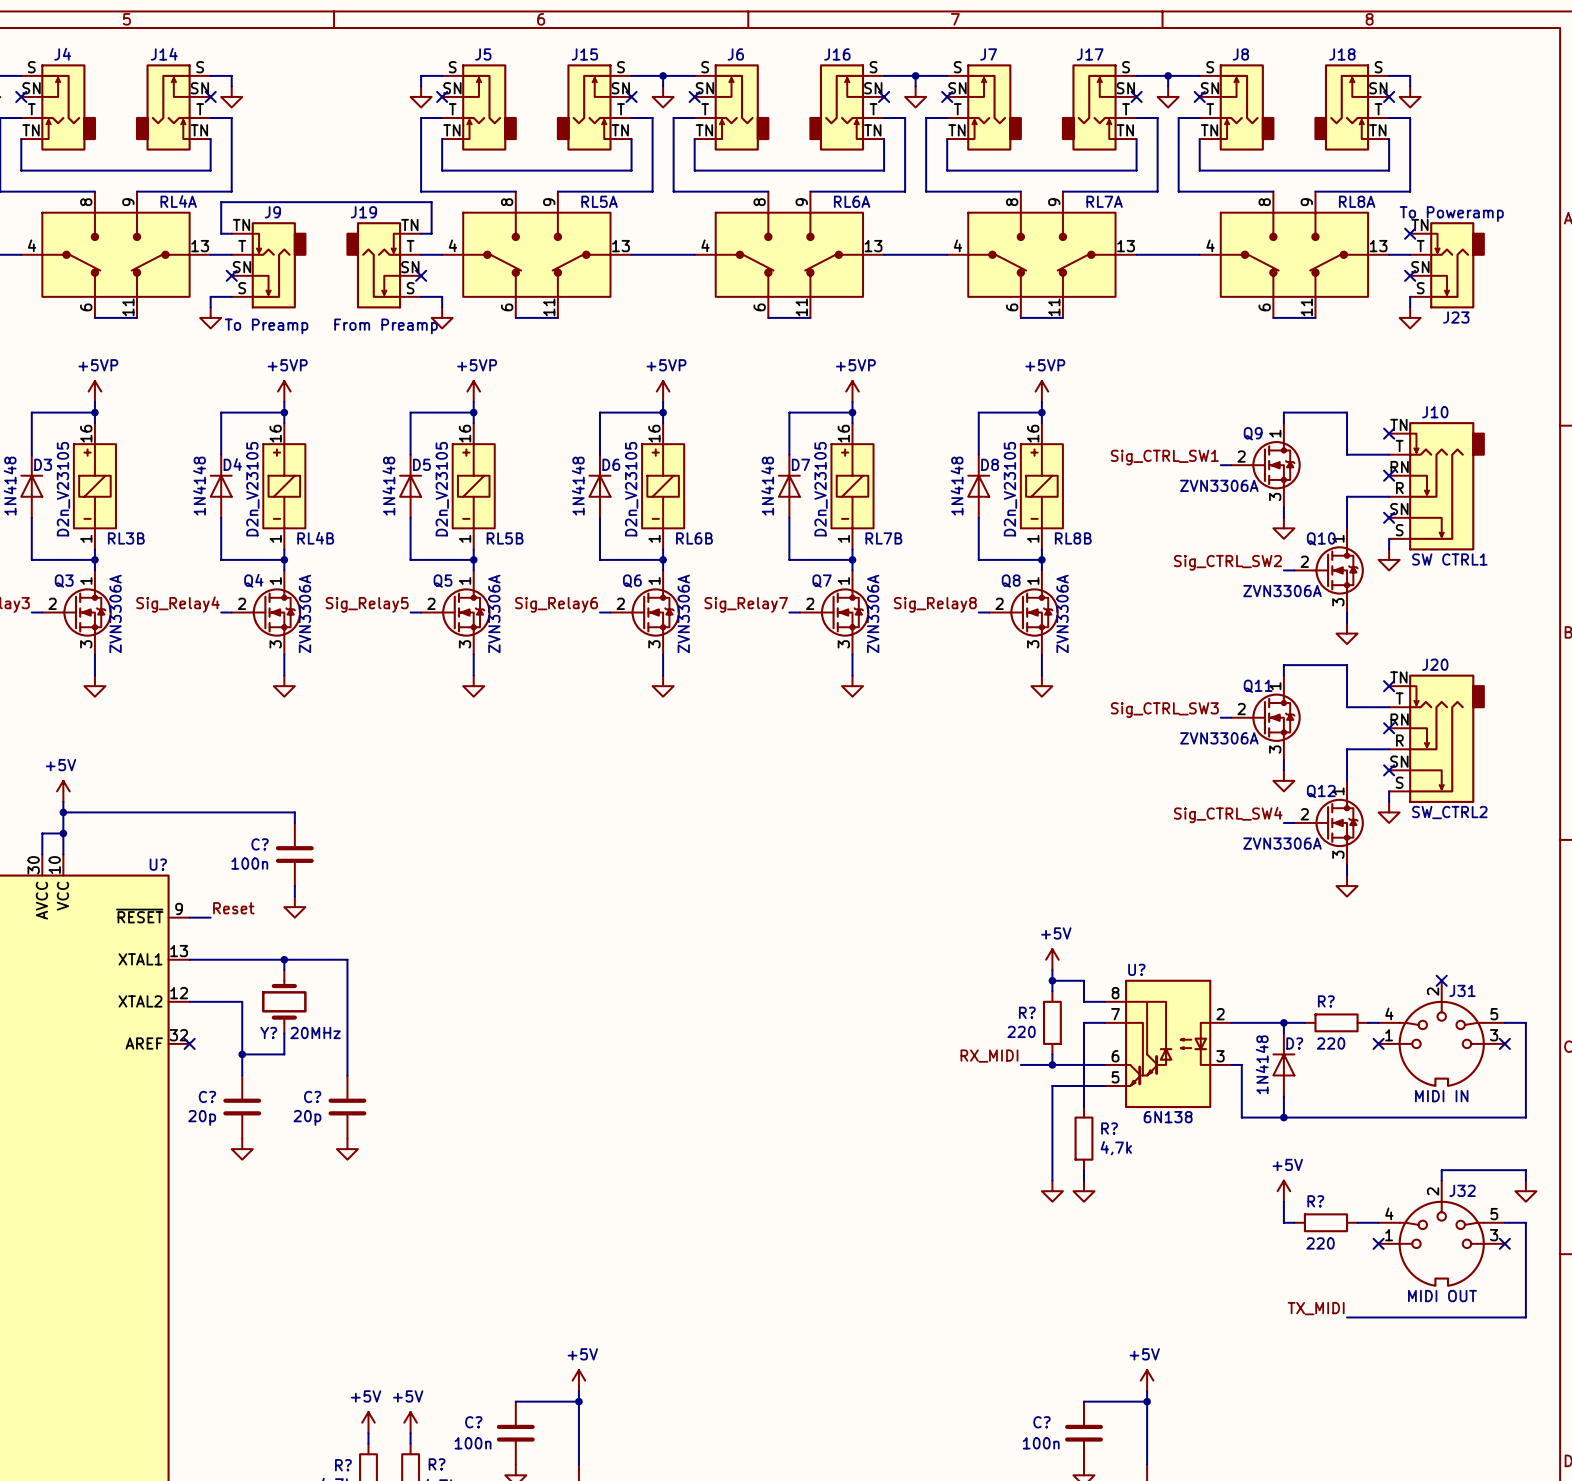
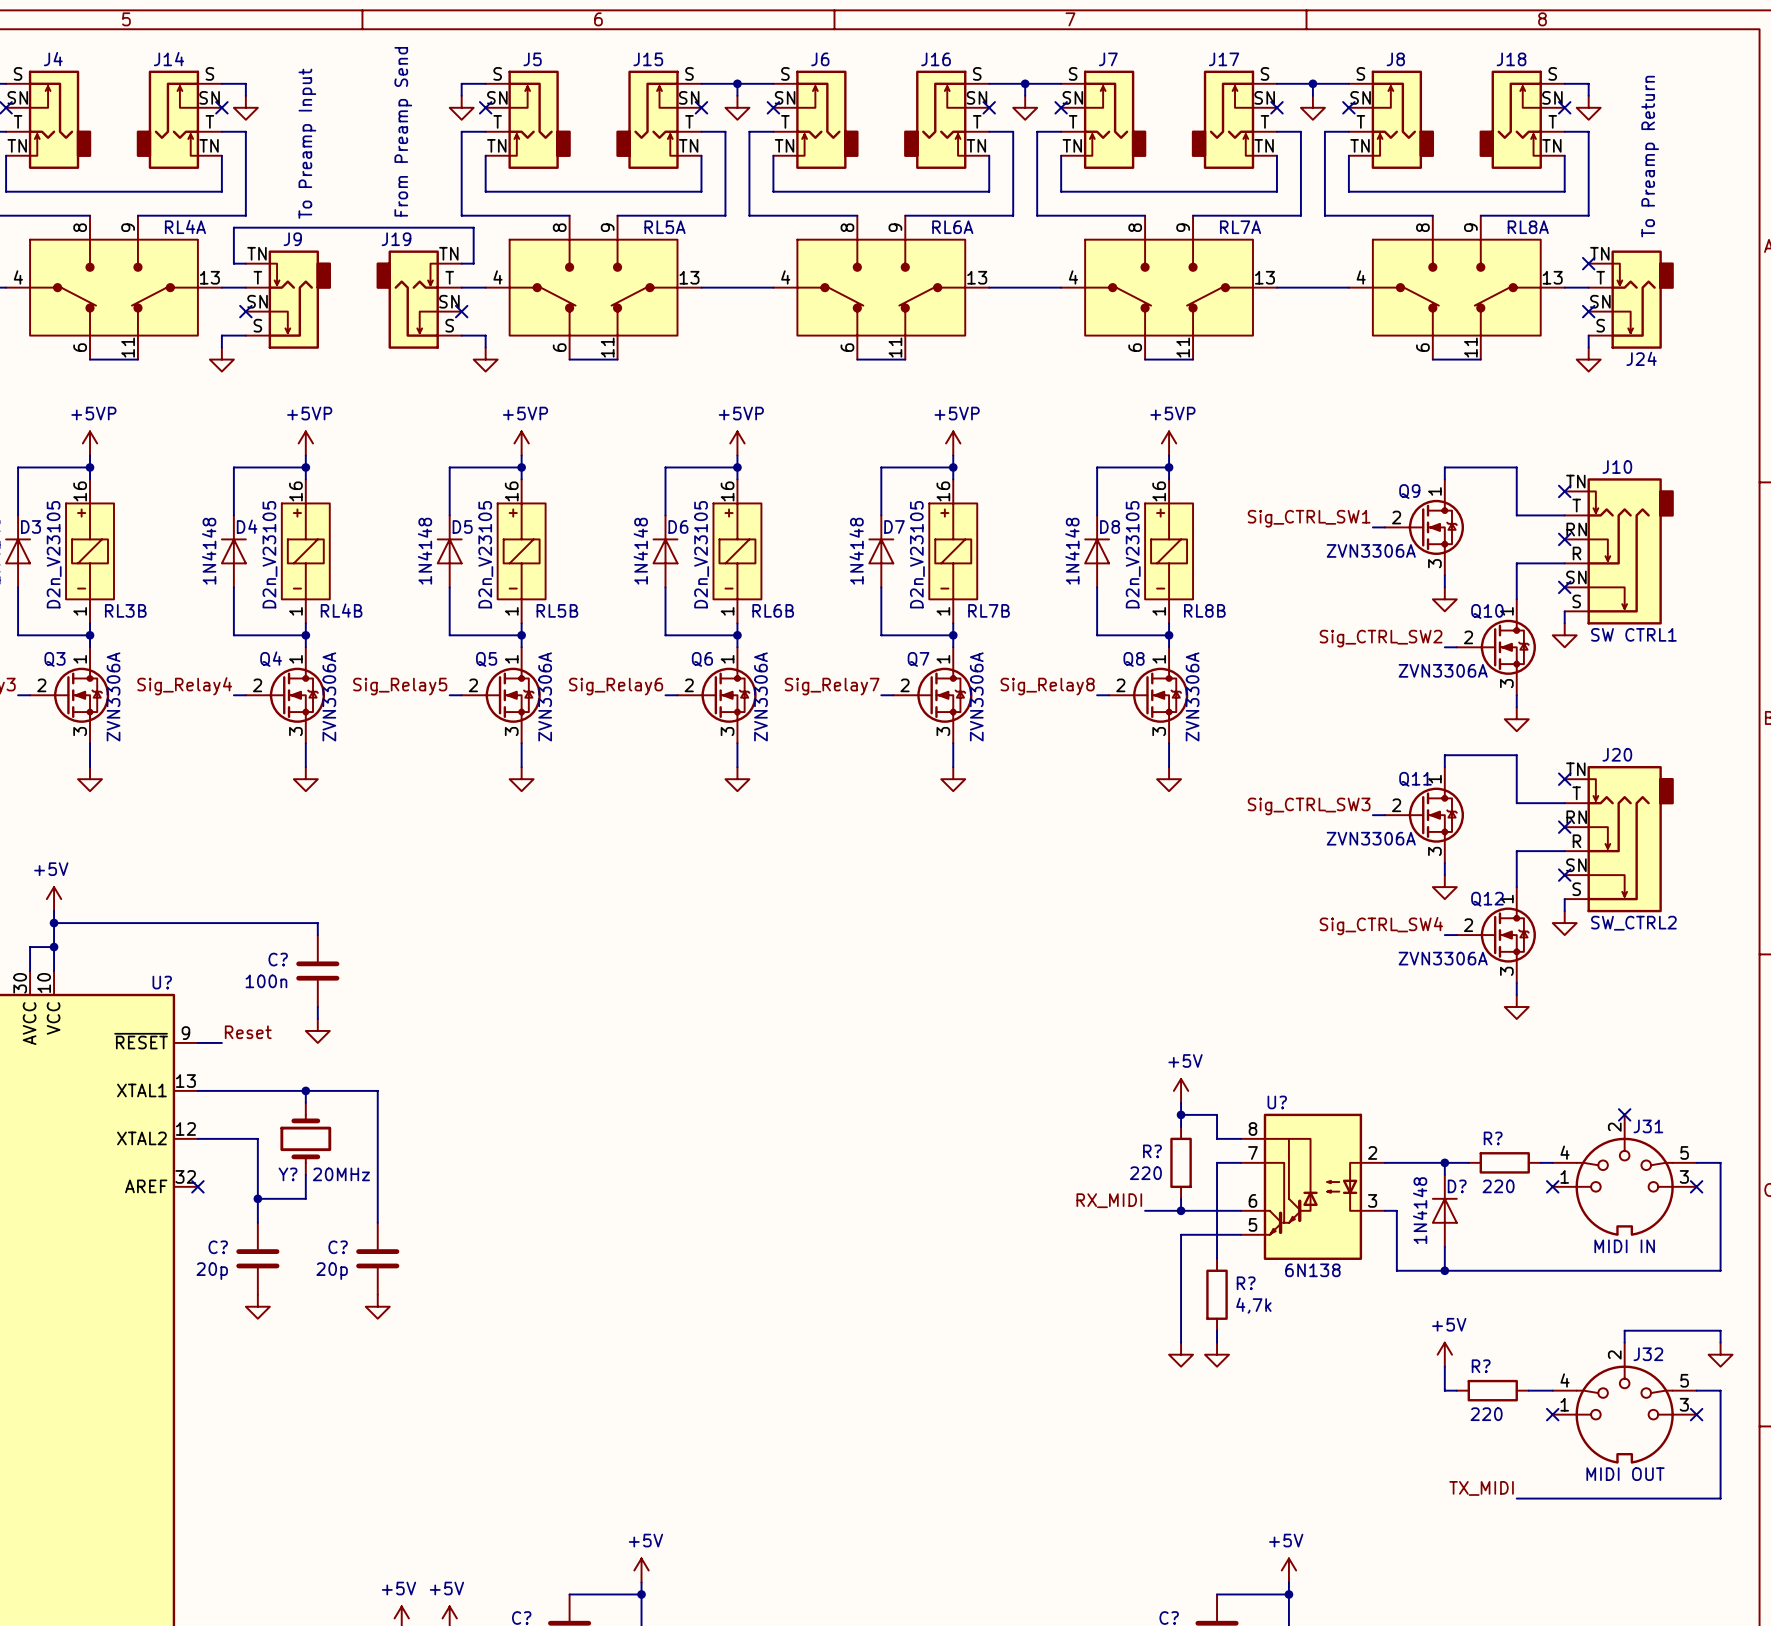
J23 value: To Poweramp (1451, 214) -> To Preamp Return (1650, 156)
J23 name: J23 (1456, 317) -> J24 (1641, 358)
J9 value: To Preamp (266, 326) -> To Preamp Input (307, 143)
J19 value: From Preamp (386, 326) -> From Preamp Send (403, 131)

